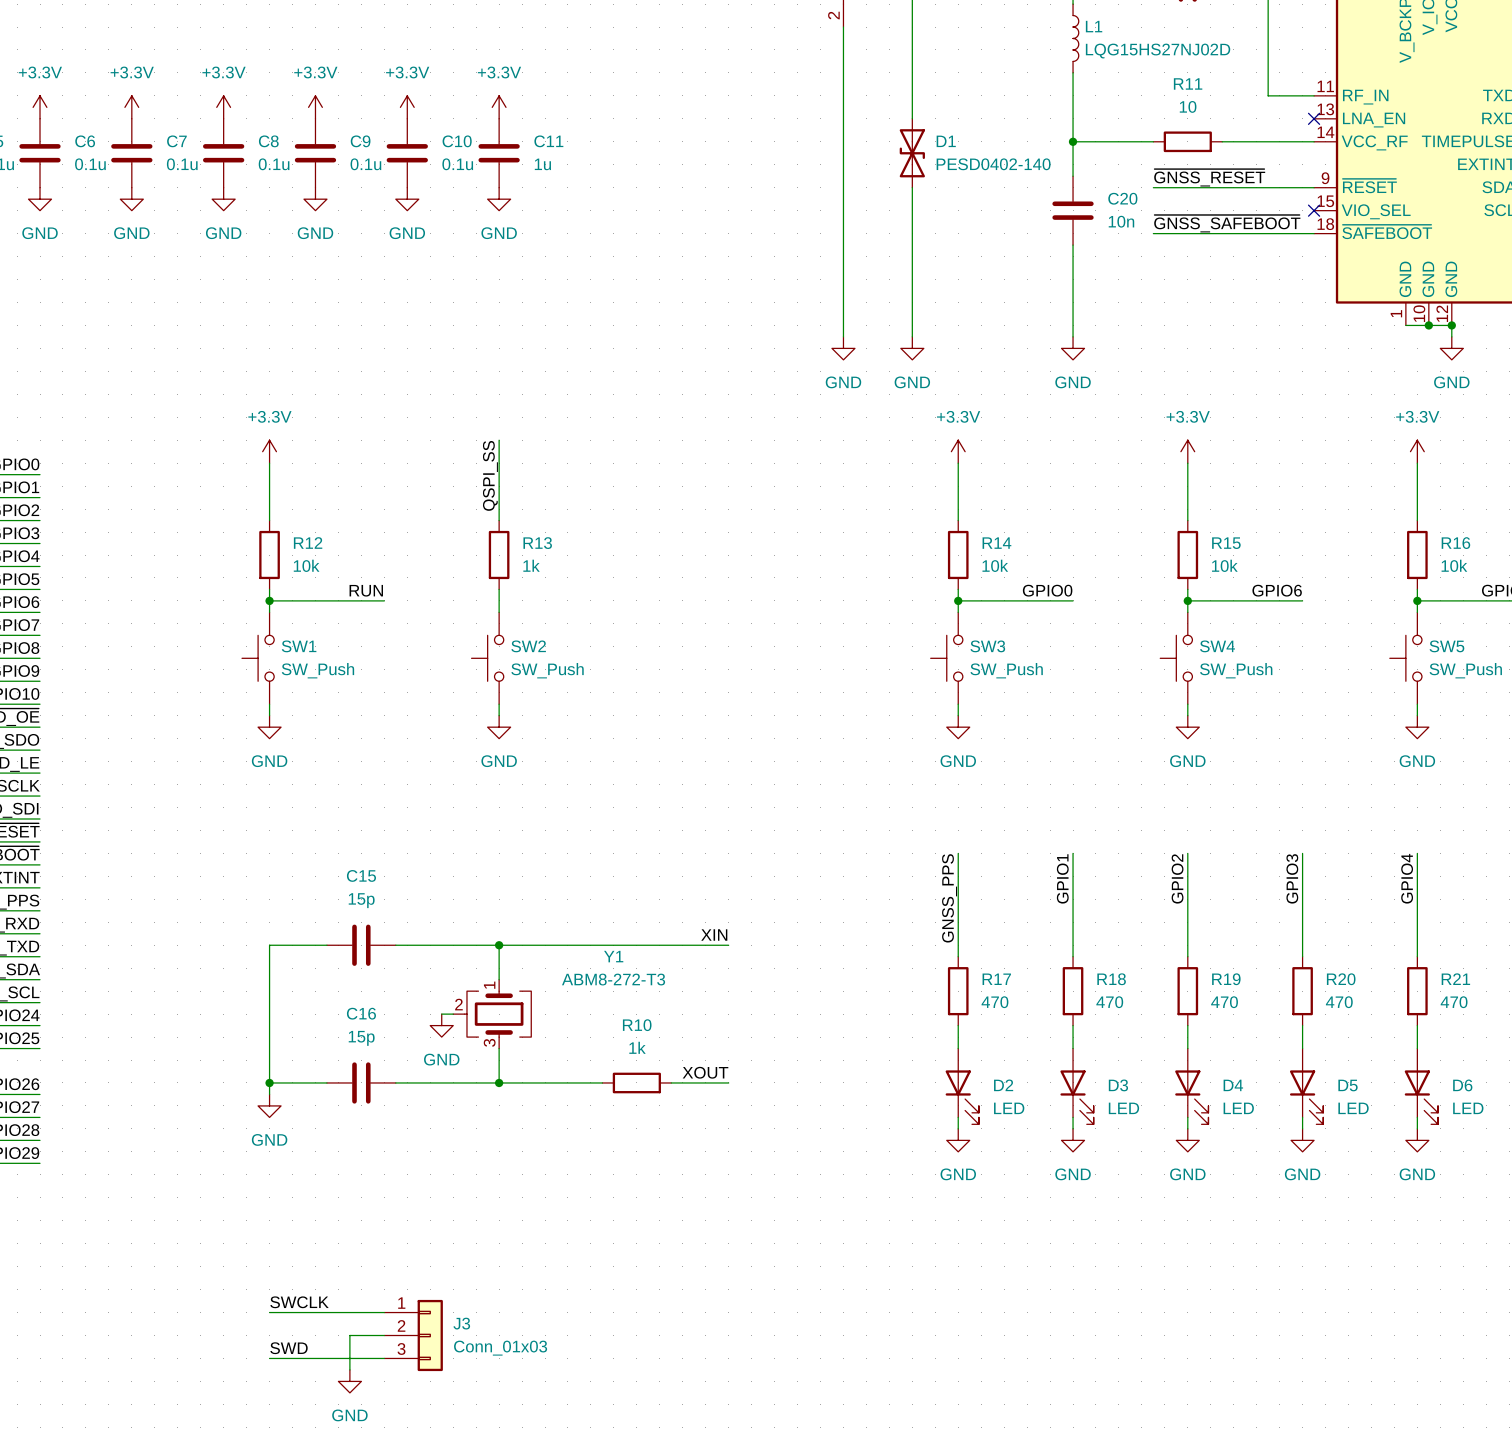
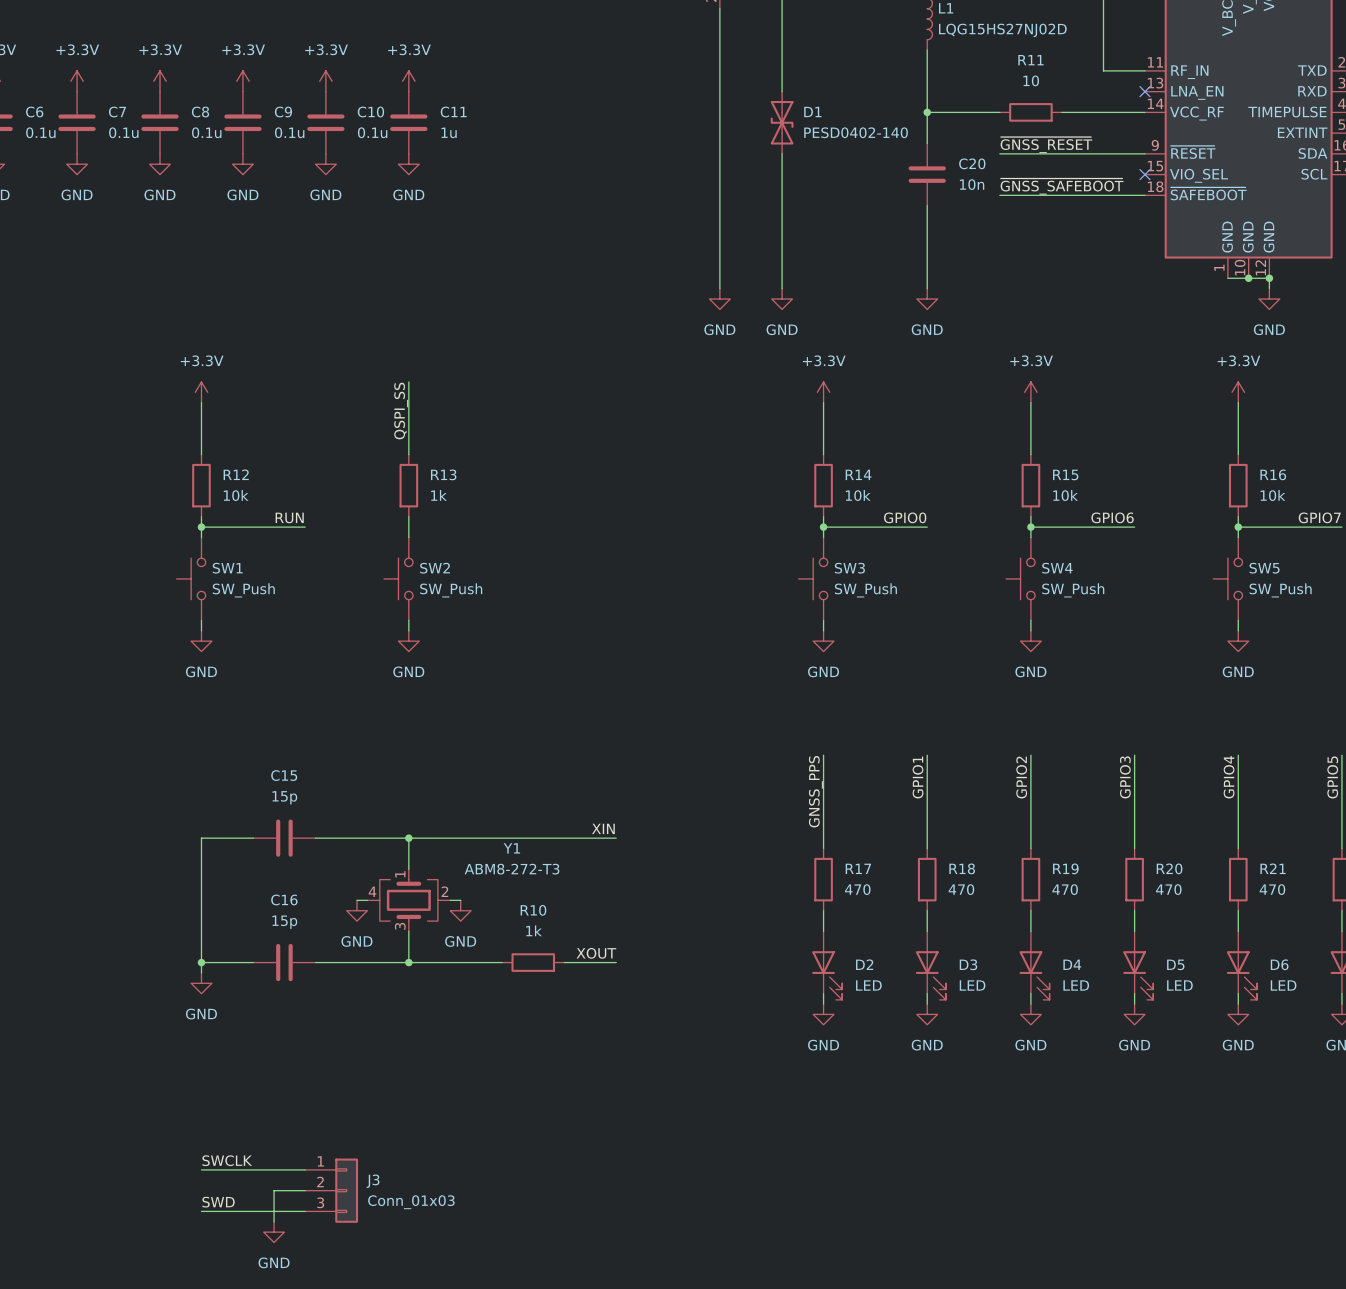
Y1 symbol: [453, 979, 532, 1049] -> [367, 869, 451, 932]
wire: none -> (450, 900) (460, 900)
power symbol: none -> GND (460, 910)

